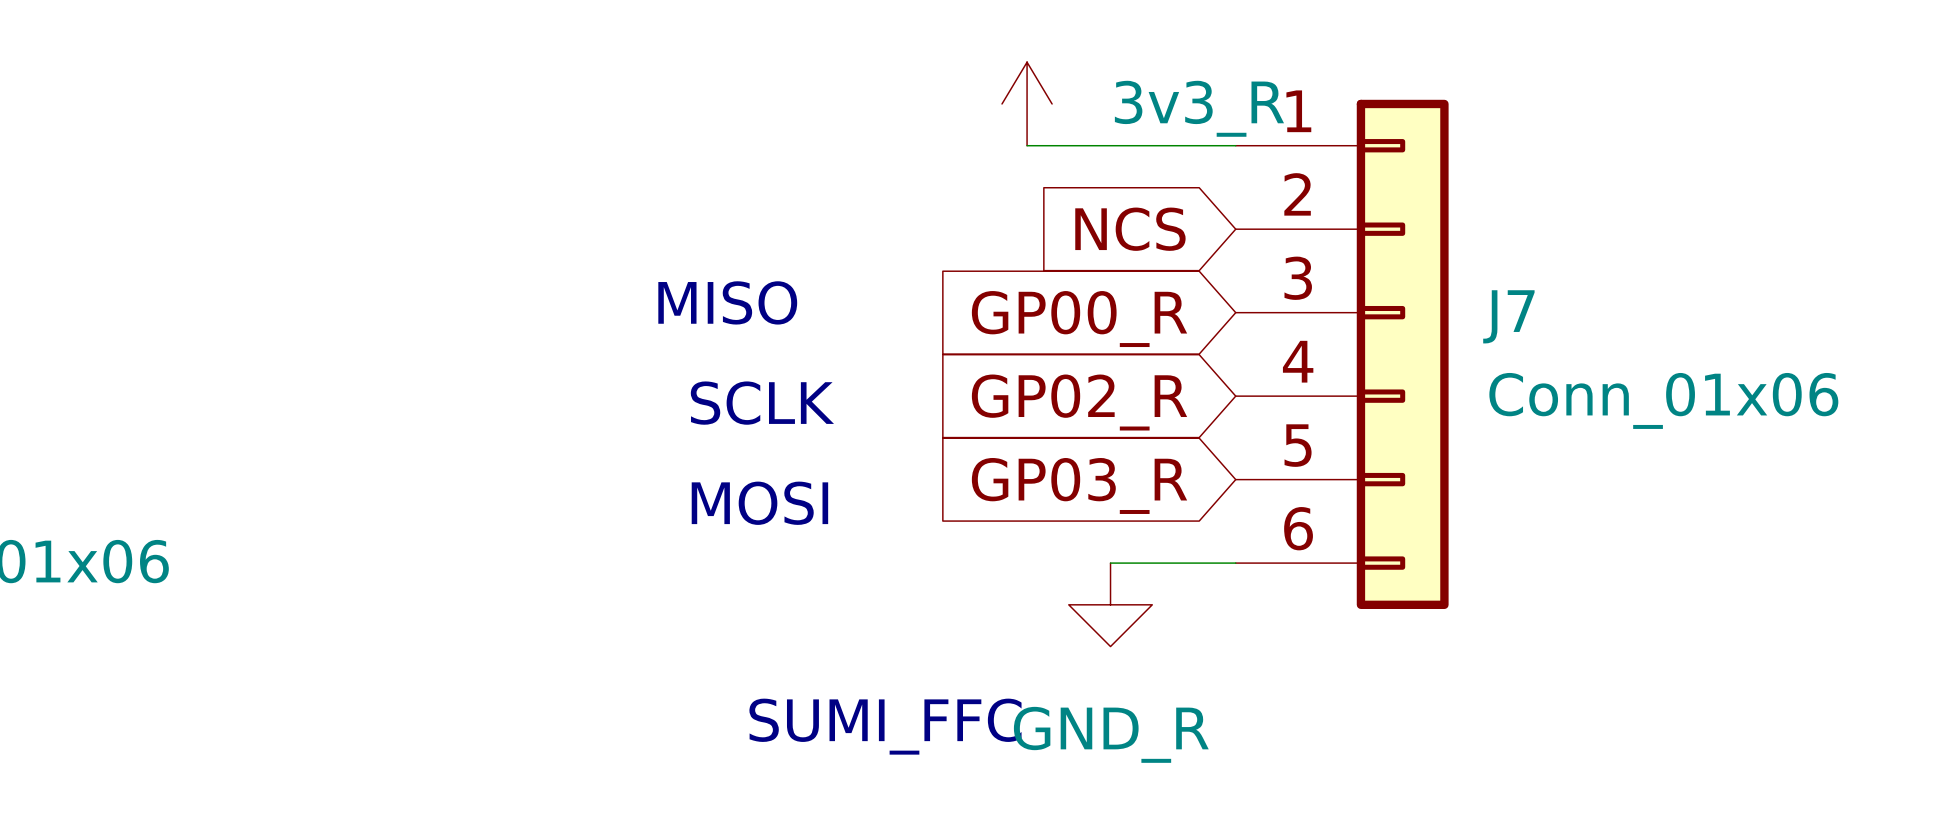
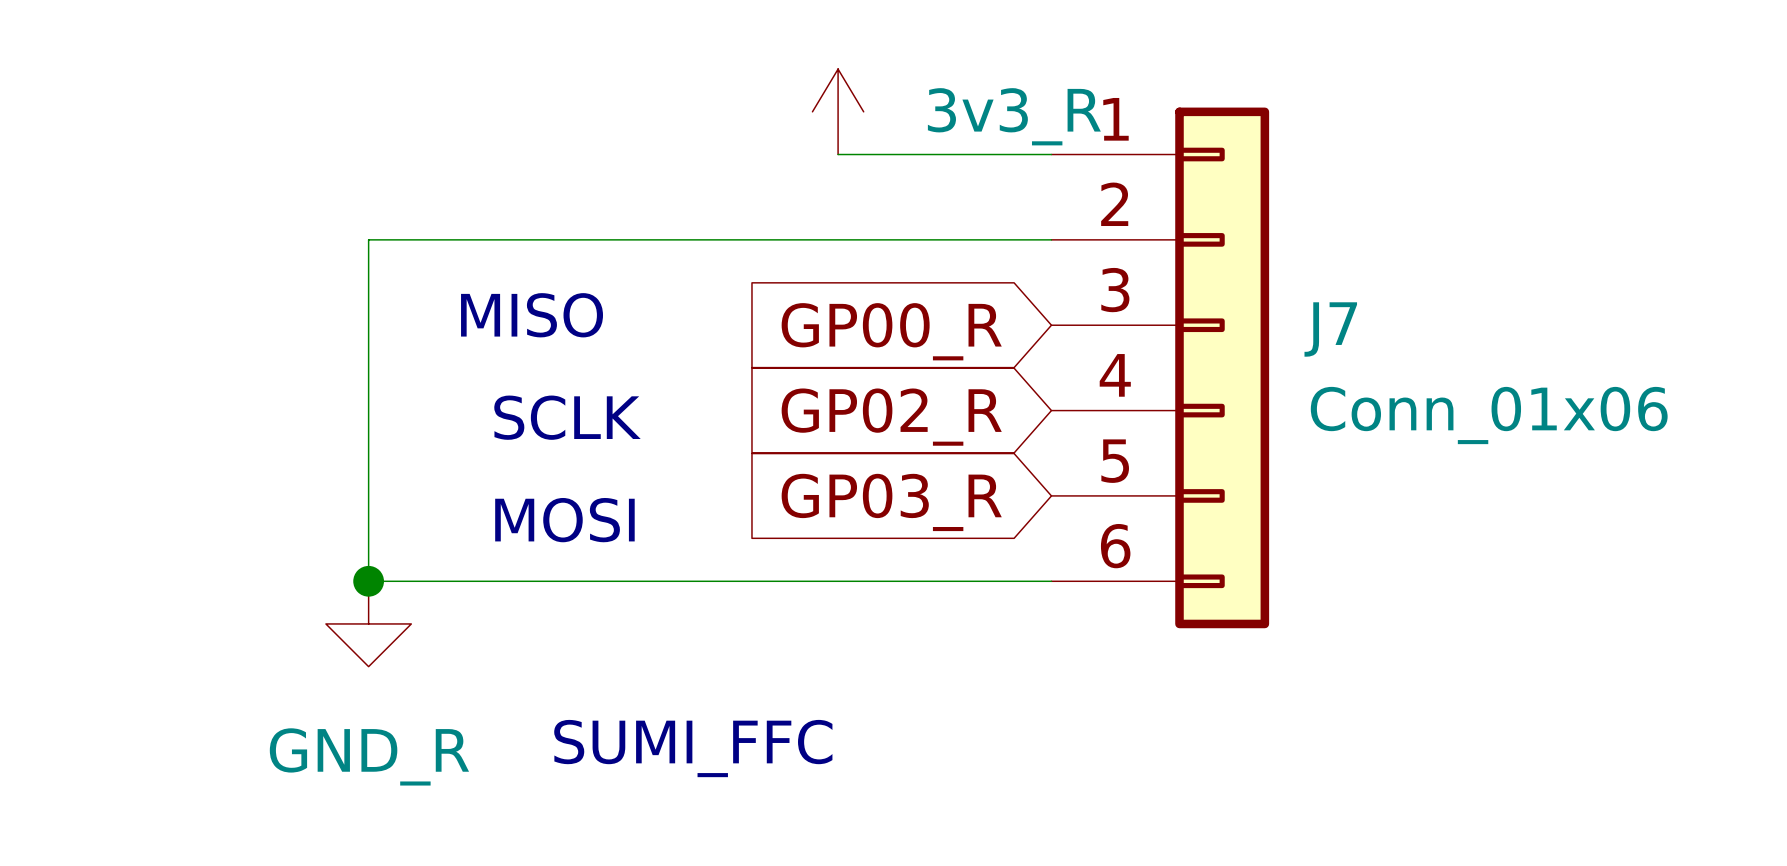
global label: NCS (1130, 229) -> none
wire: none -> (1051, 239) (368, 239) (368, 581) (923, 581)
junction: none -> (368, 581)
power symbol position: GND_R (1110, 604) -> GND_R (368, 623)

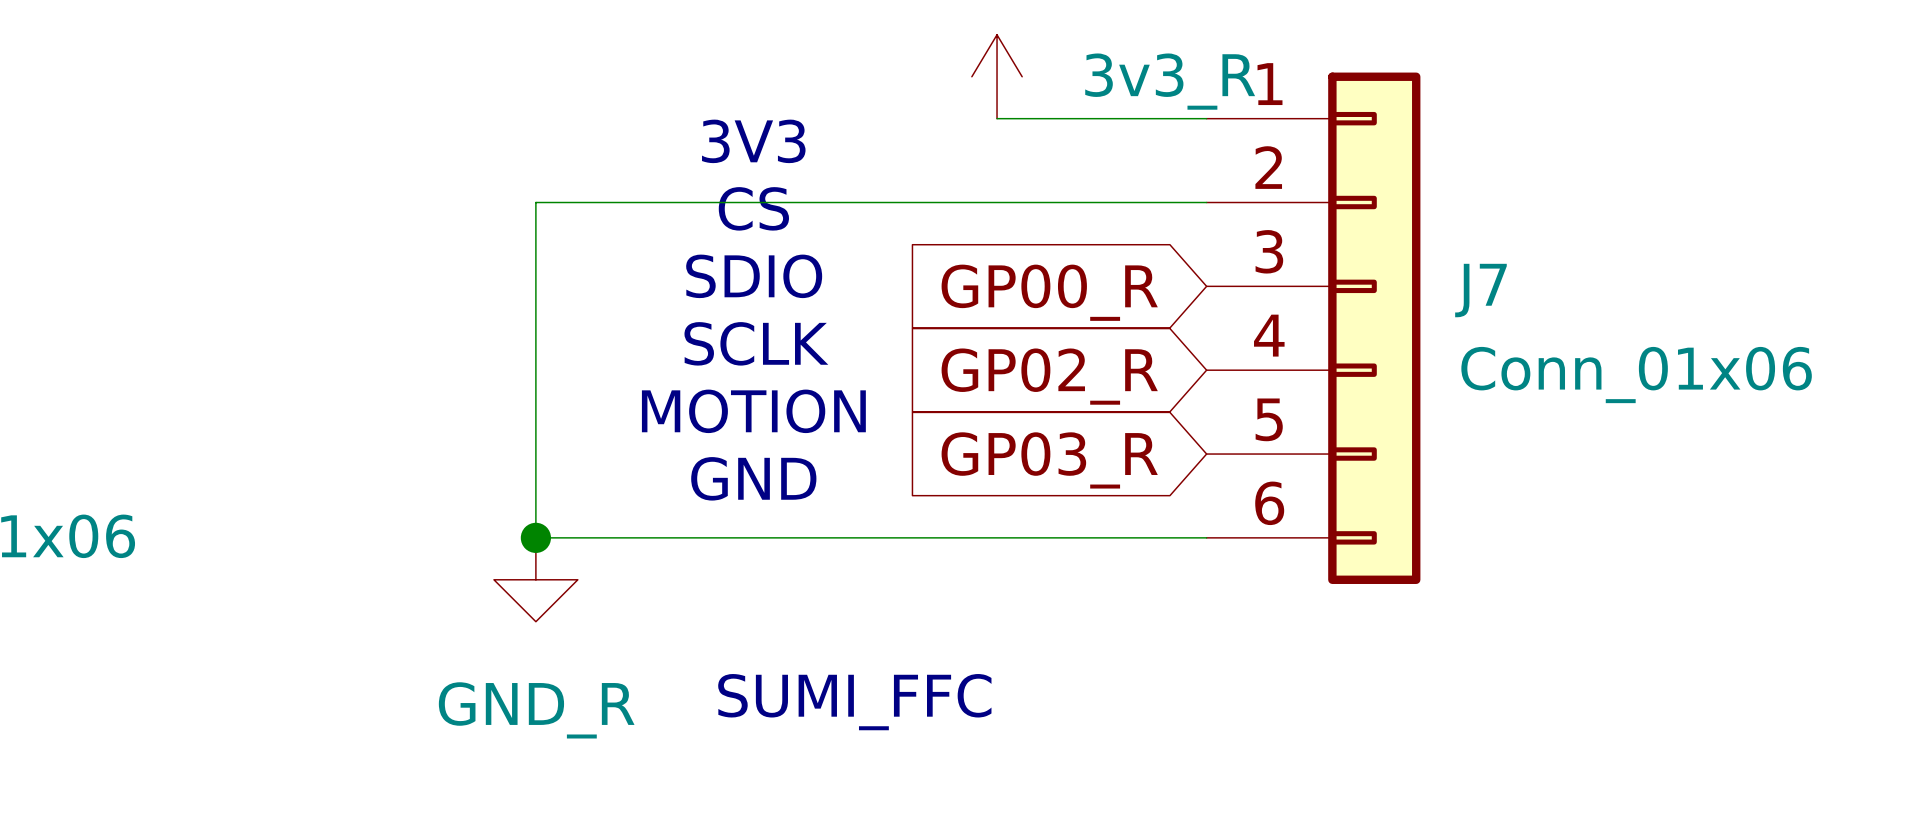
text: none -> 3V3 (753, 141)
text: none -> CS (753, 208)
text: MISO (532, 315) -> none
text: none -> SDIO (754, 276)
text position: SCLK (567, 417) -> SCLK (756, 343)
text: none -> MOTION (753, 411)
text: MOSI (564, 520) -> GND (753, 478)

